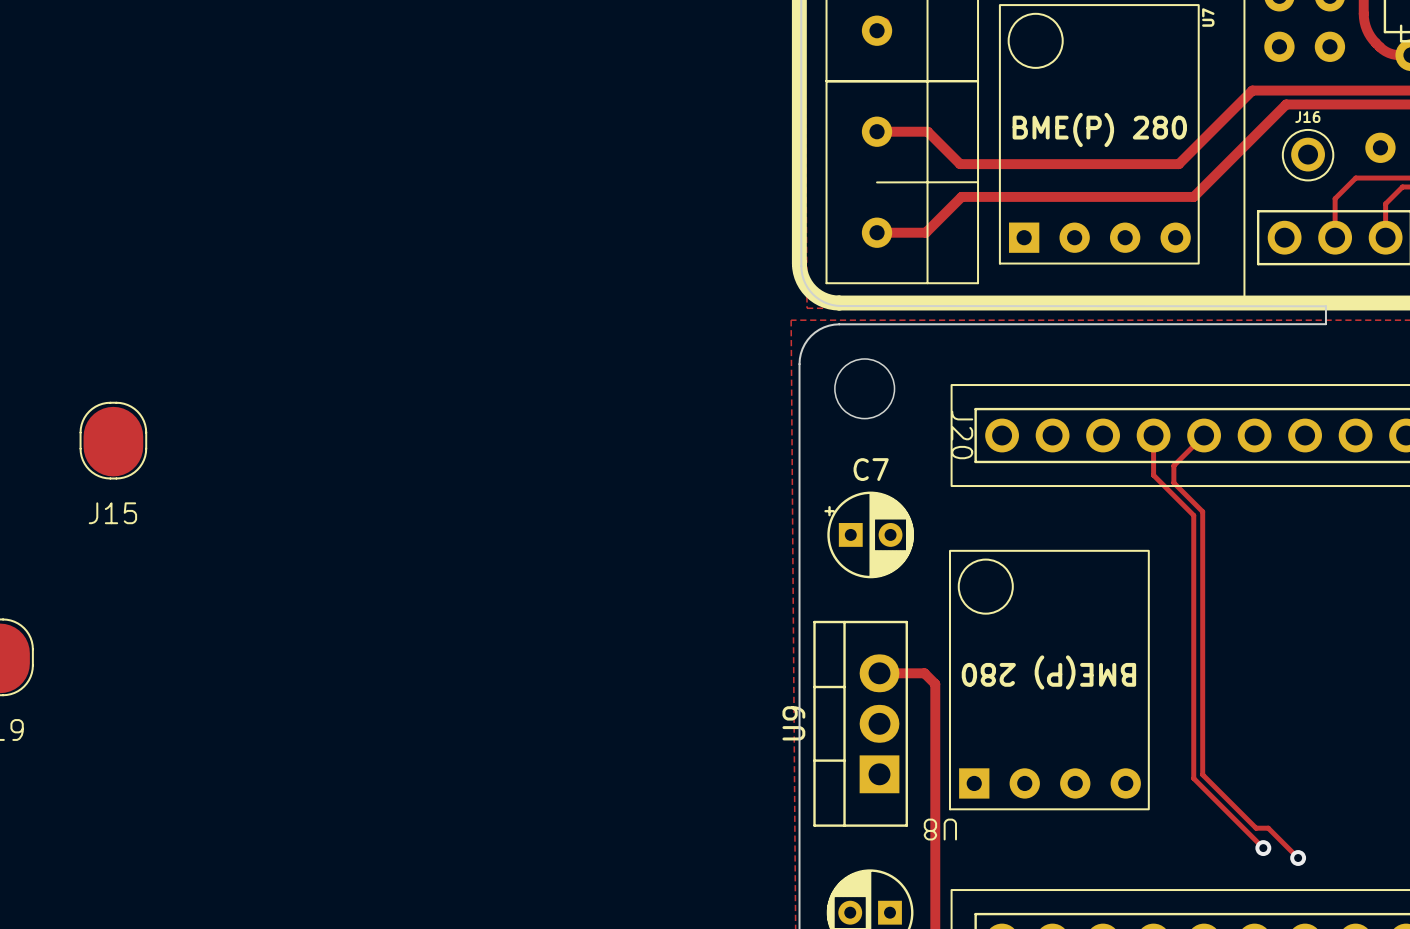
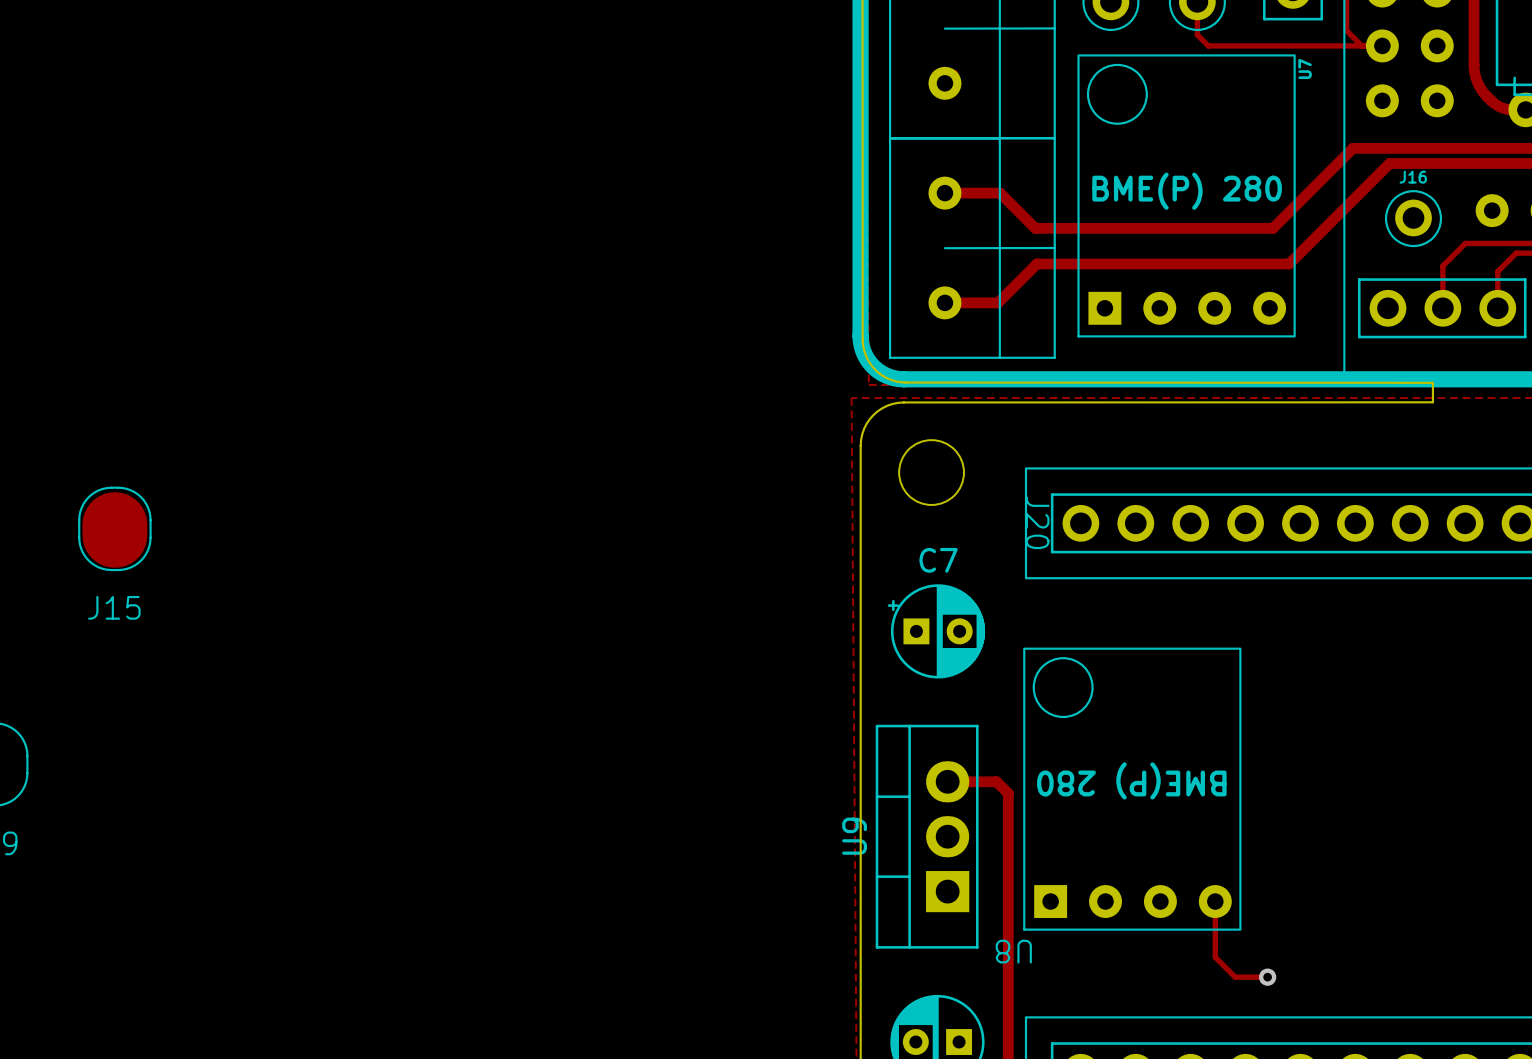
track: (1153, 435) (1153, 475) (1193, 515) (1193, 778) (1263, 848) -> none
track: (1204, 435) (1173, 465) (1173, 482) (1202, 511) (1202, 774) (1256, 828) (1268, 828) (1298, 858) -> none
track: none -> (1215, 901) (1215, 957) (1235, 977) (1267, 977)
via: (1263, 848) -> none
via: none -> (1267, 977)
via: (1298, 858) -> none

